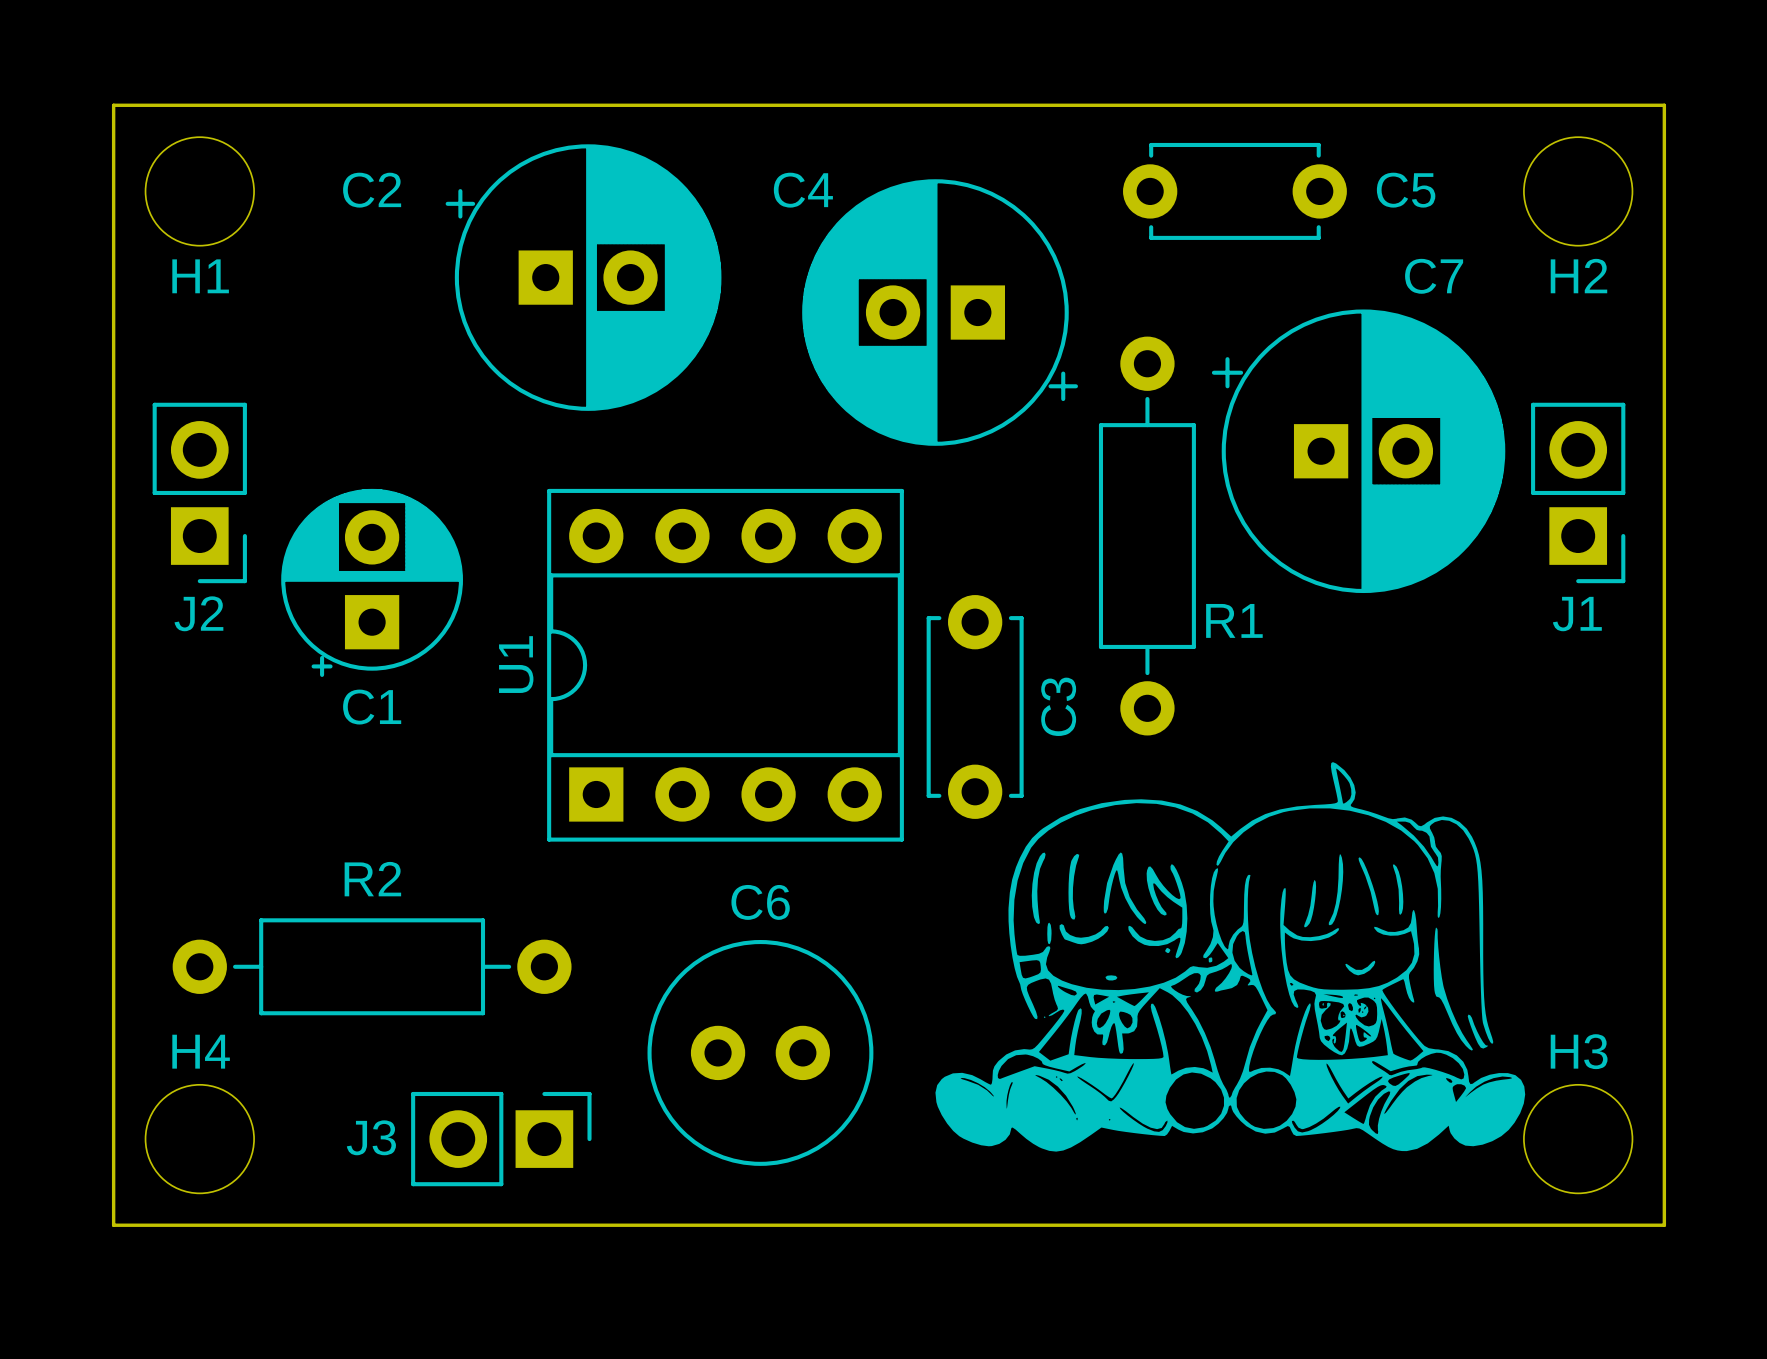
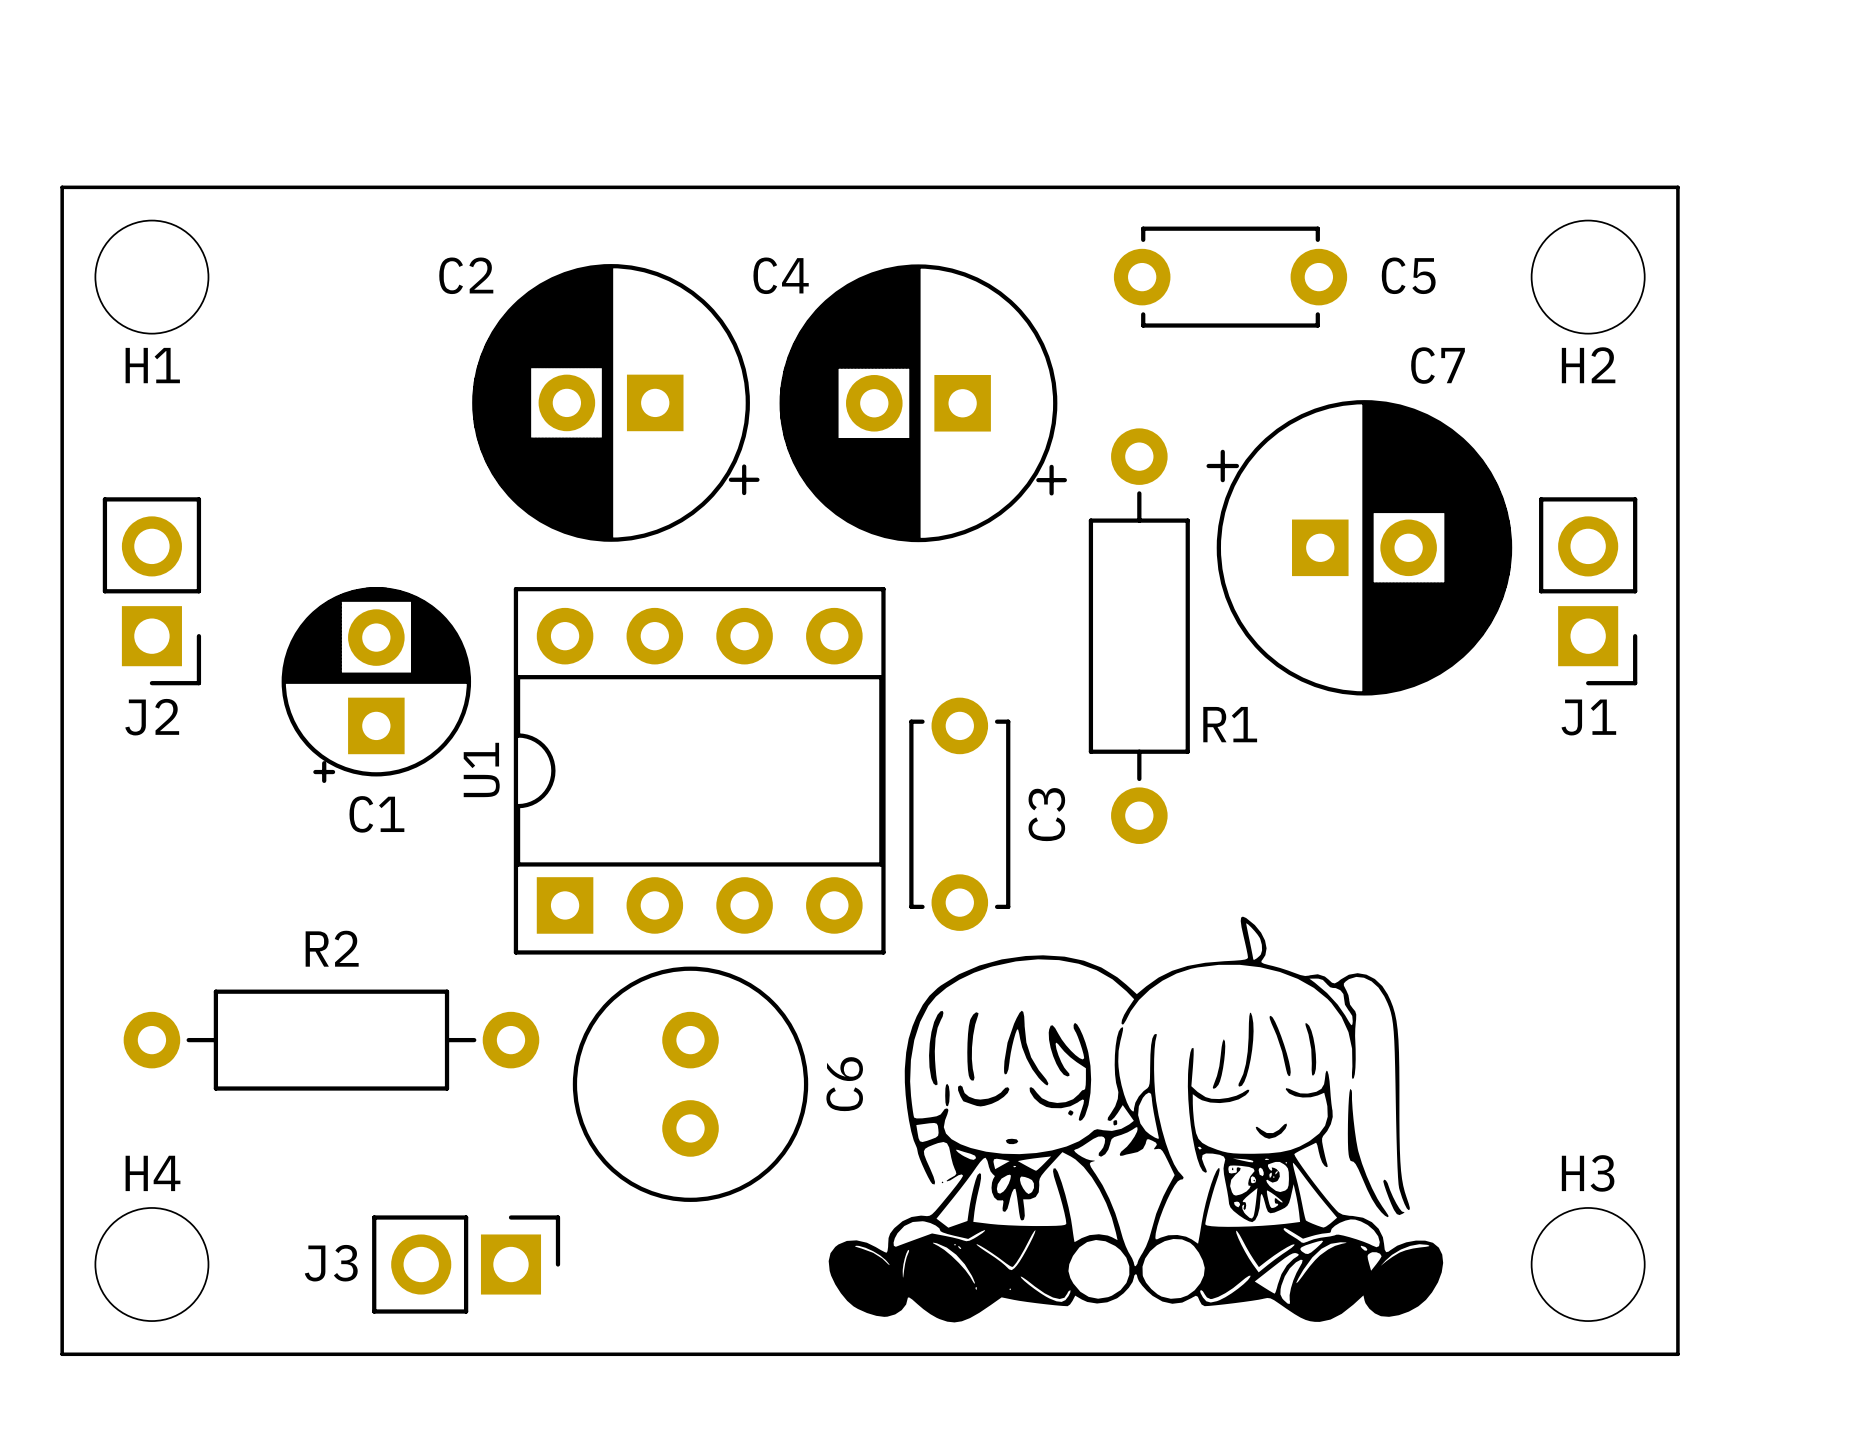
C2 name position: C2 (372, 190) -> C2 (466, 275)
C2 rotation: 0° (583, 277) -> 180° (615, 402)
C1 position: (372, 582) -> (376, 685)
drawing position: (1230, 956) -> (1135, 1119)
R2 position: (372, 966) -> (331, 1040)
C6 rotation: 0° (760, 1052) -> 90° clockwise (690, 1084)

